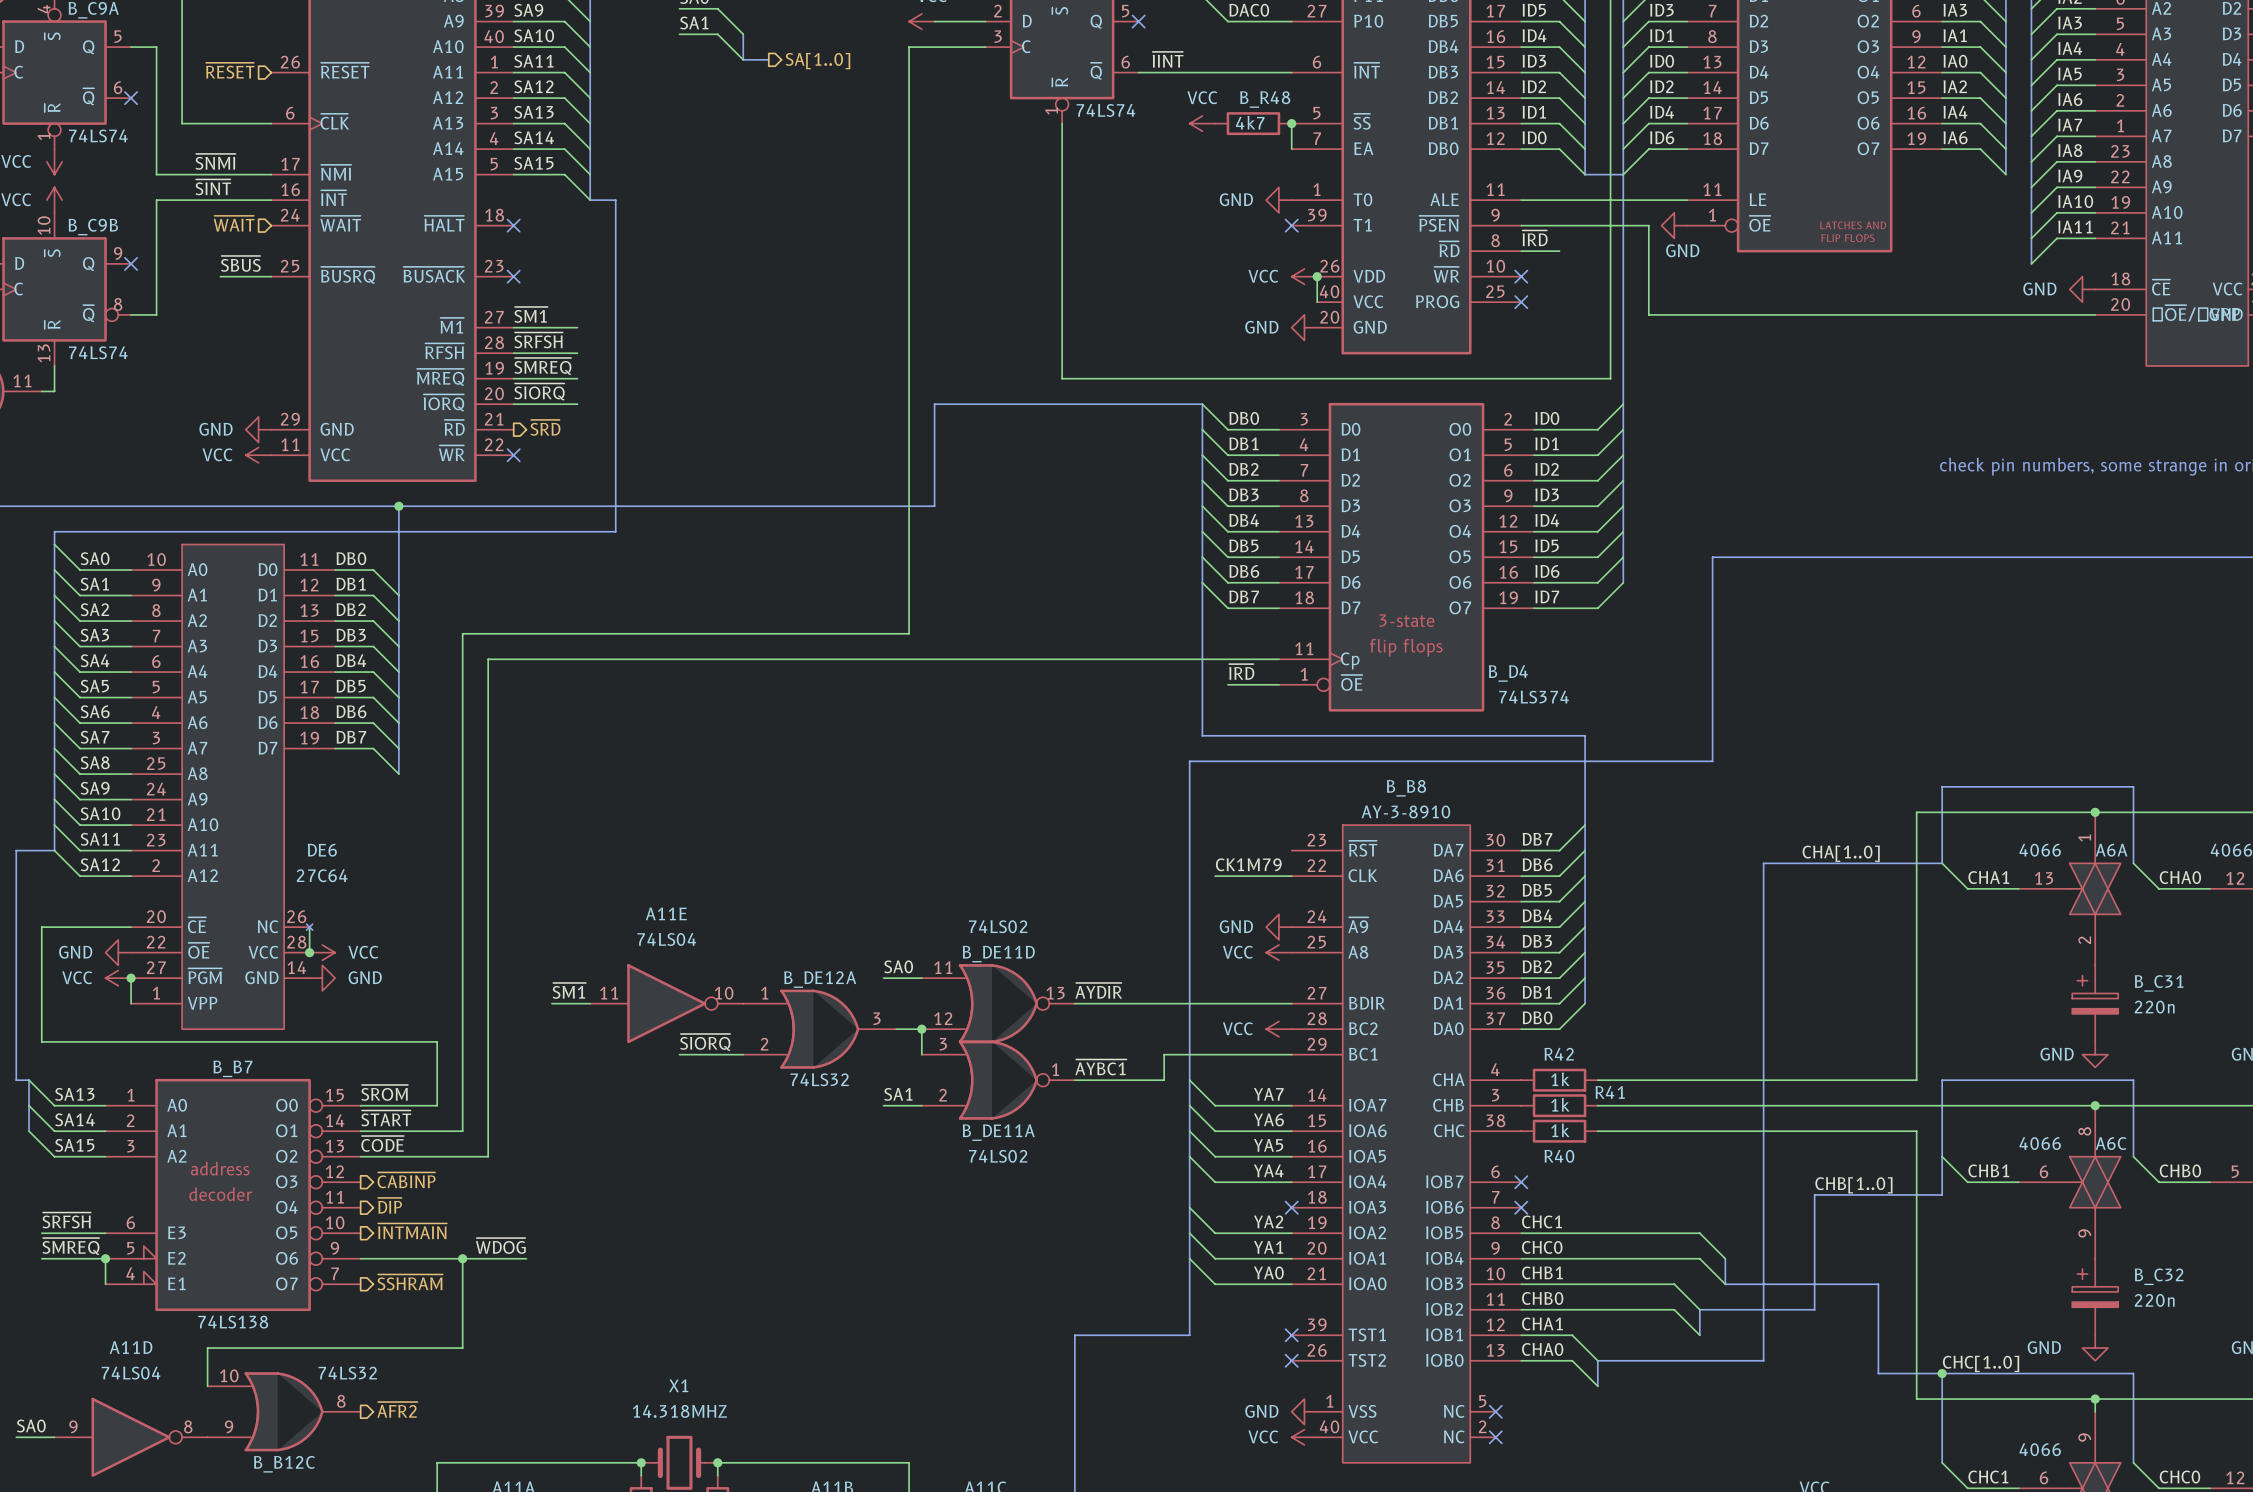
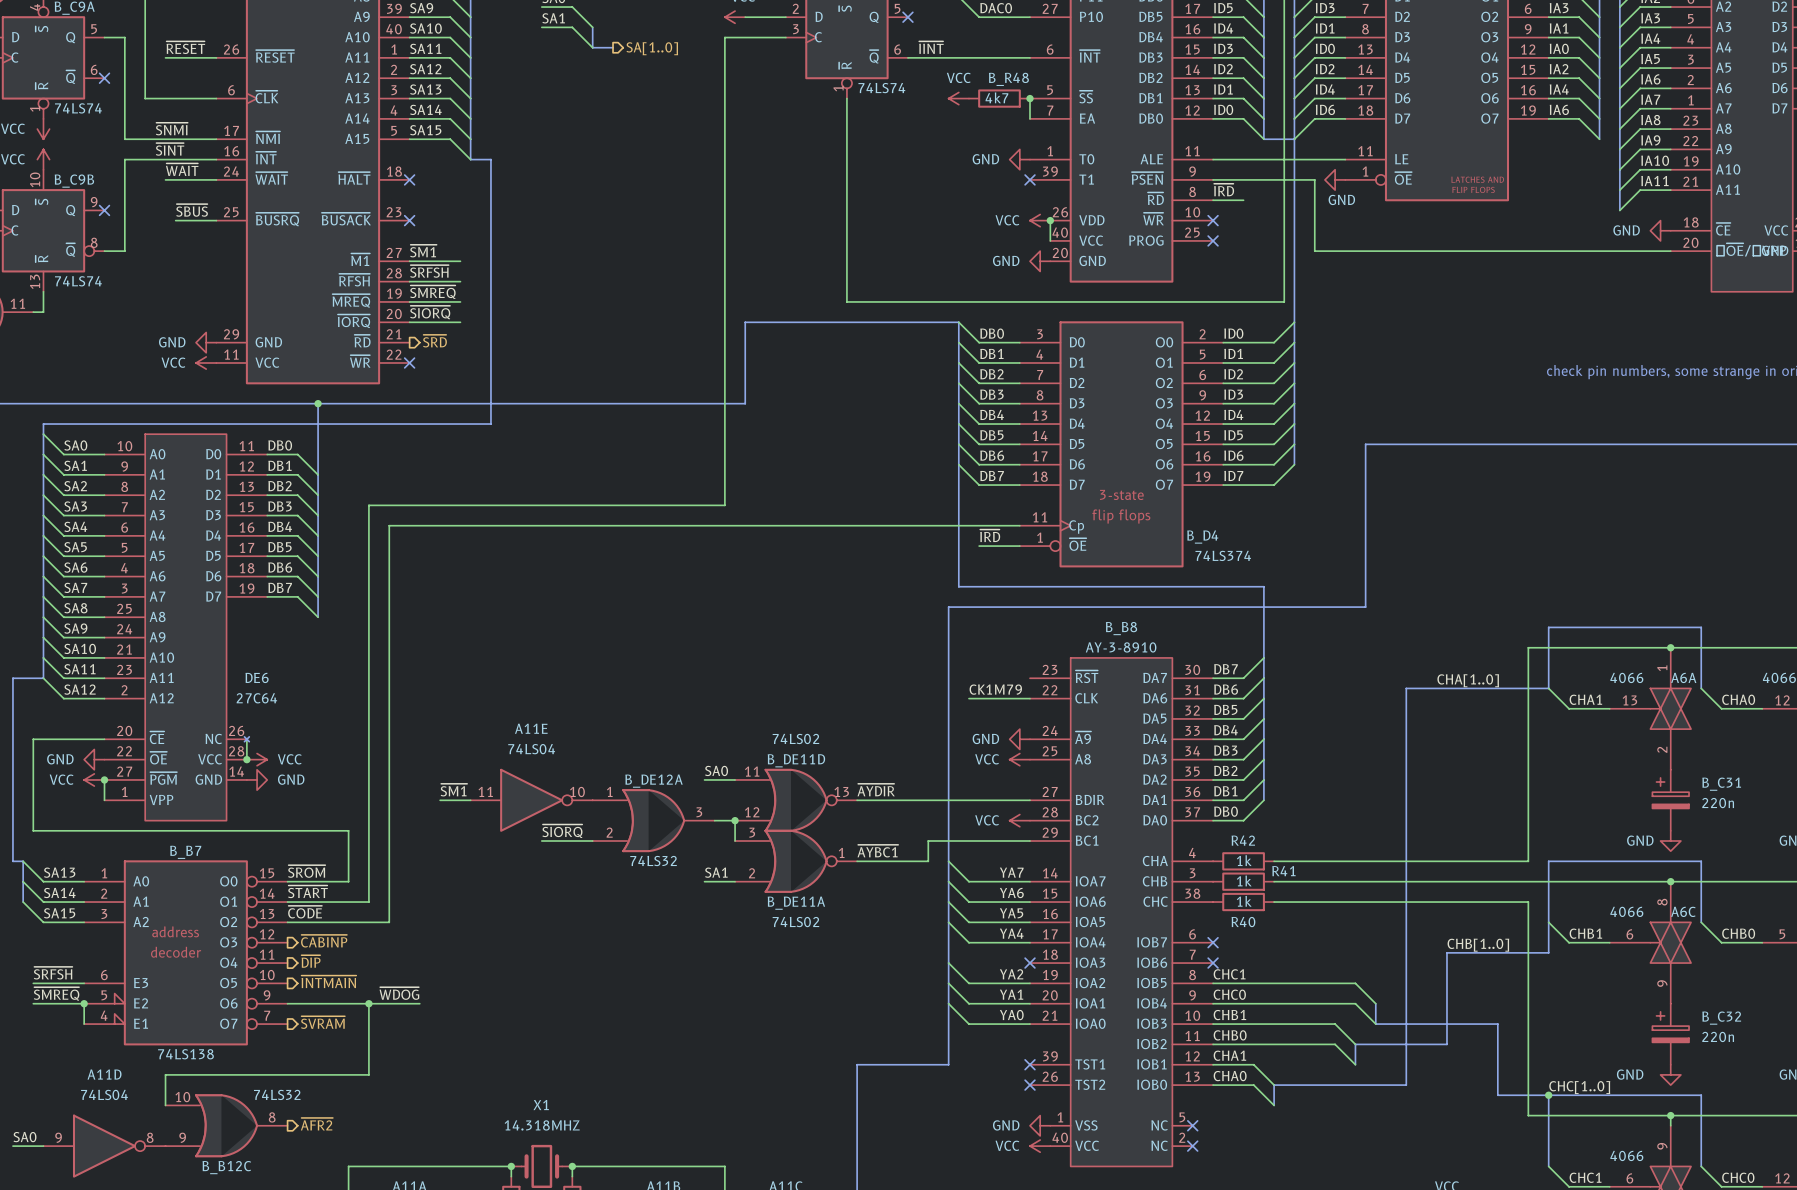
label: none -> ~{RESET} (185, 47)
hierarchical label: ~{RESET} (230, 70) -> none
wire: none -> (165, 57) (216, 57)
label: none -> ~{WAIT} (182, 169)
hierarchical label: ~{WAIT} (234, 223) -> none
wire: none -> (165, 179) (216, 179)
hierarchical label: ~{SSHRAM} (410, 1282) -> ~{SVRAM} (323, 1022)

